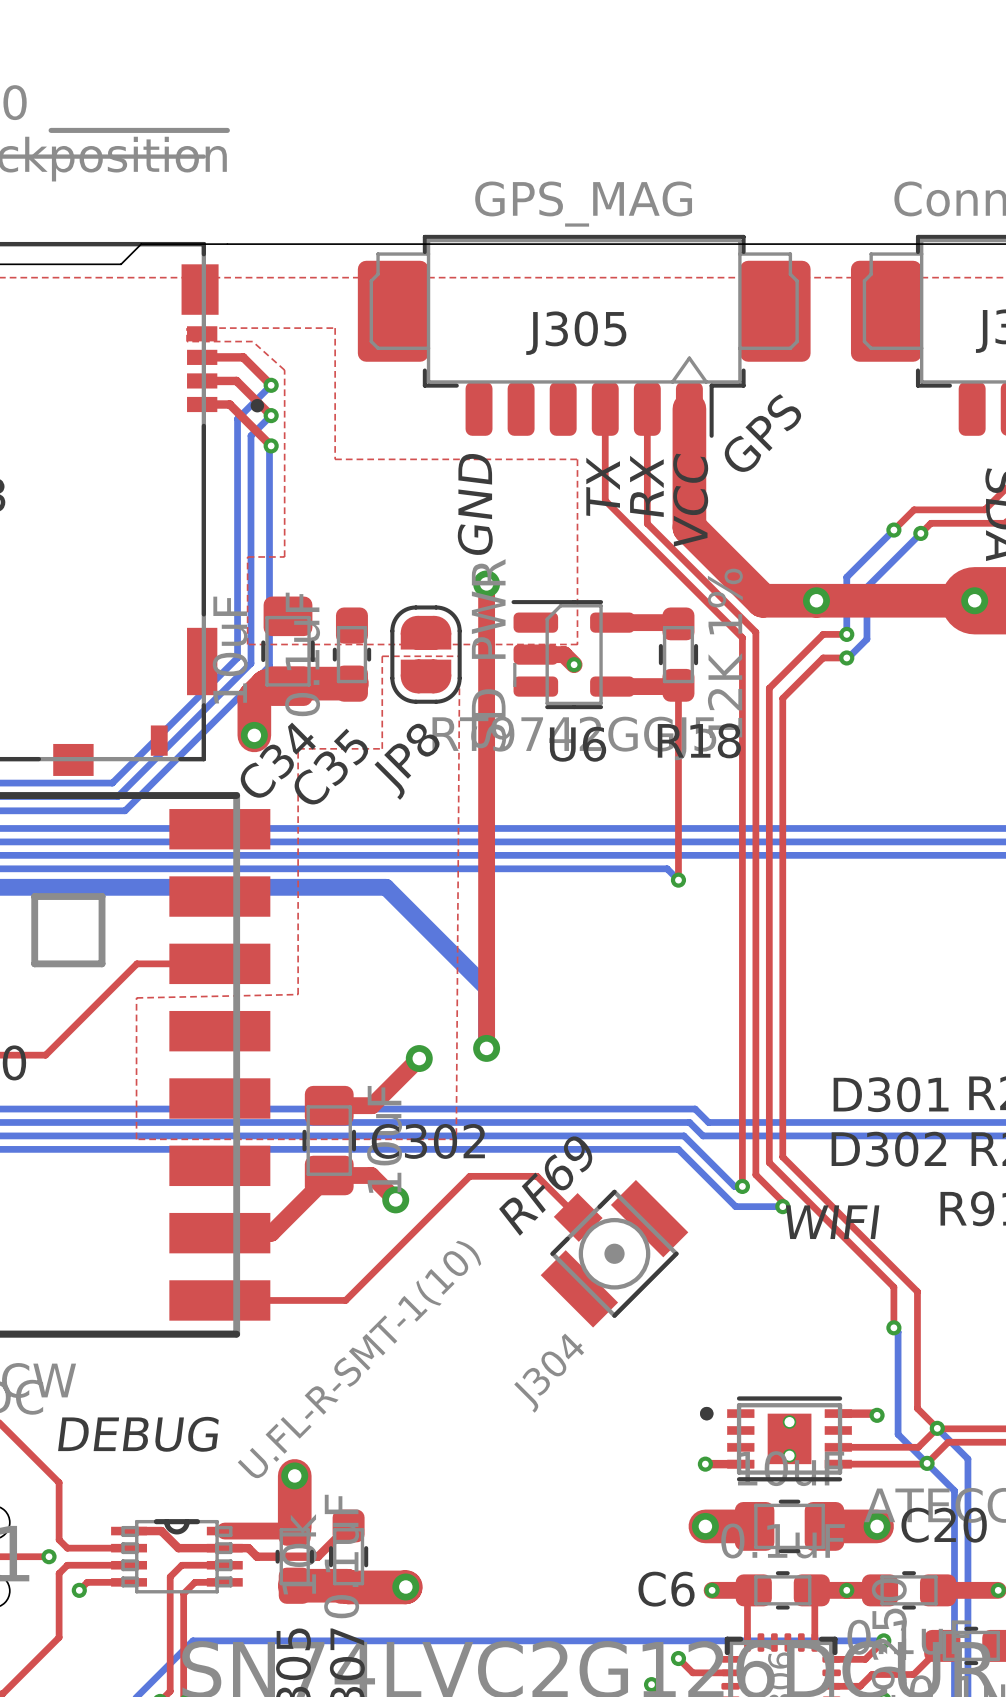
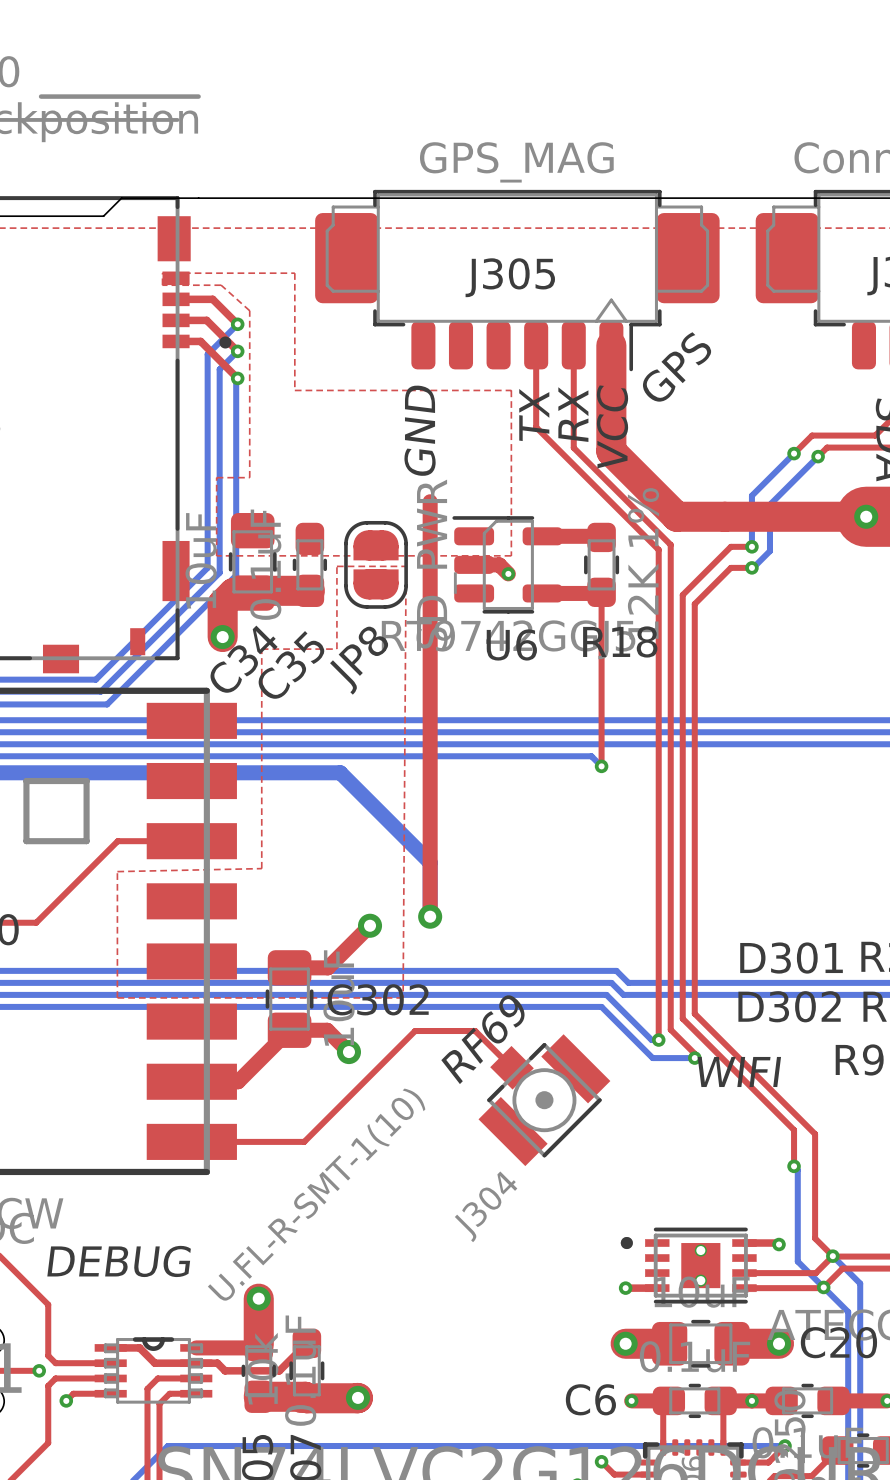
via: (486, 583) -> none
via: (816, 600) -> none

